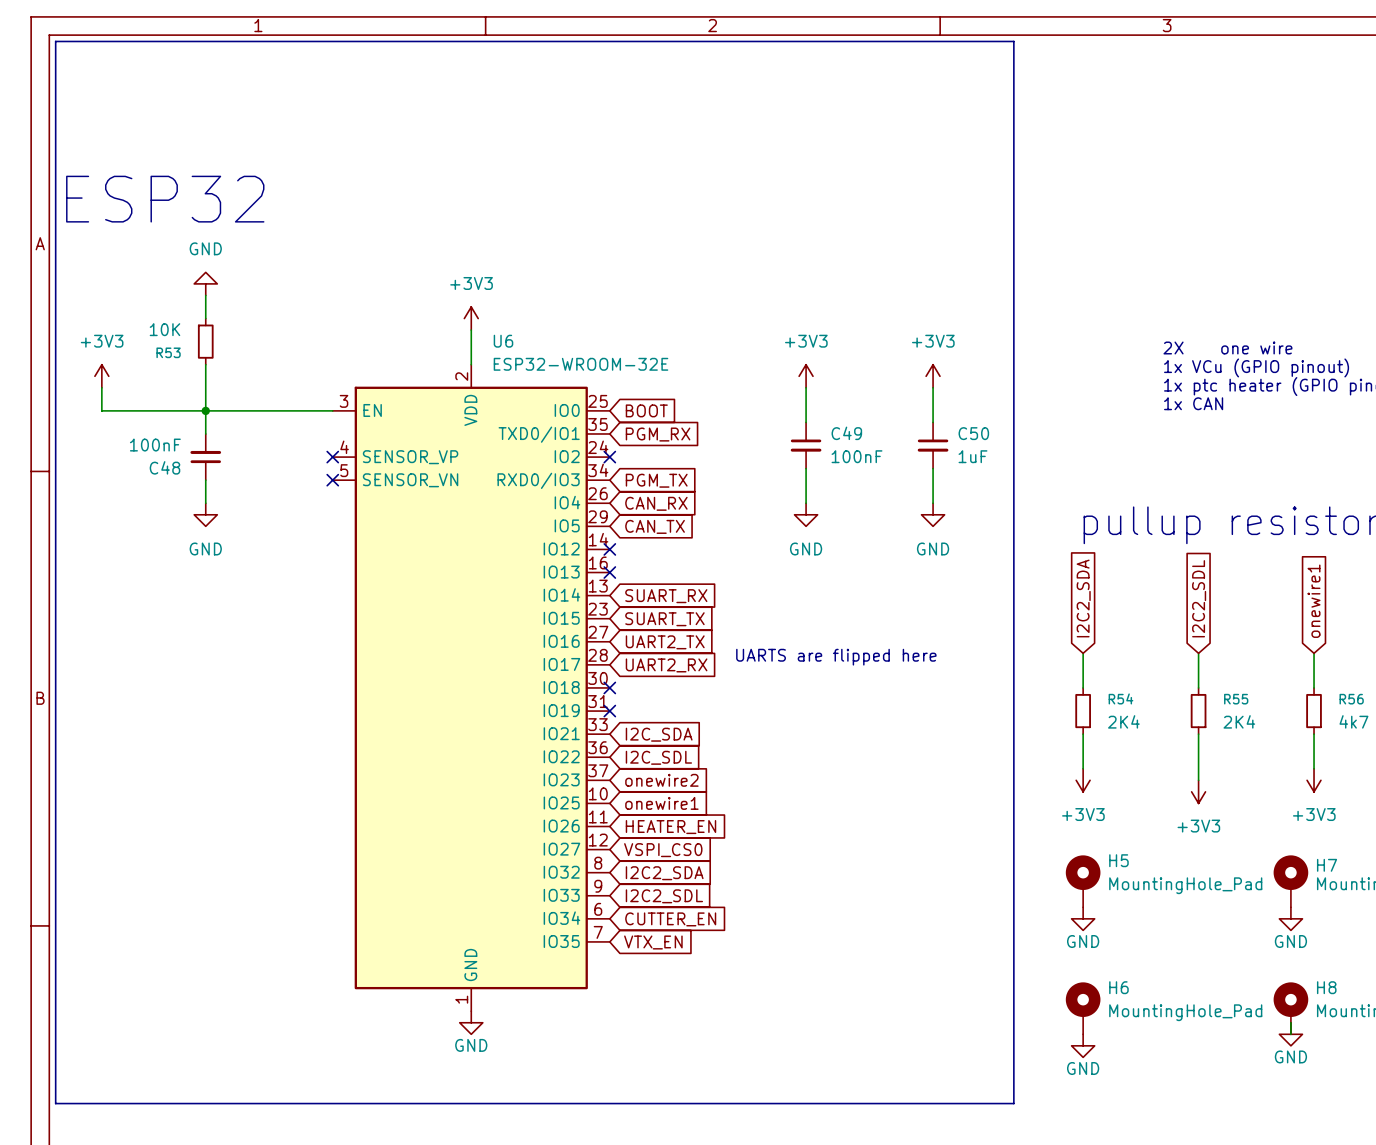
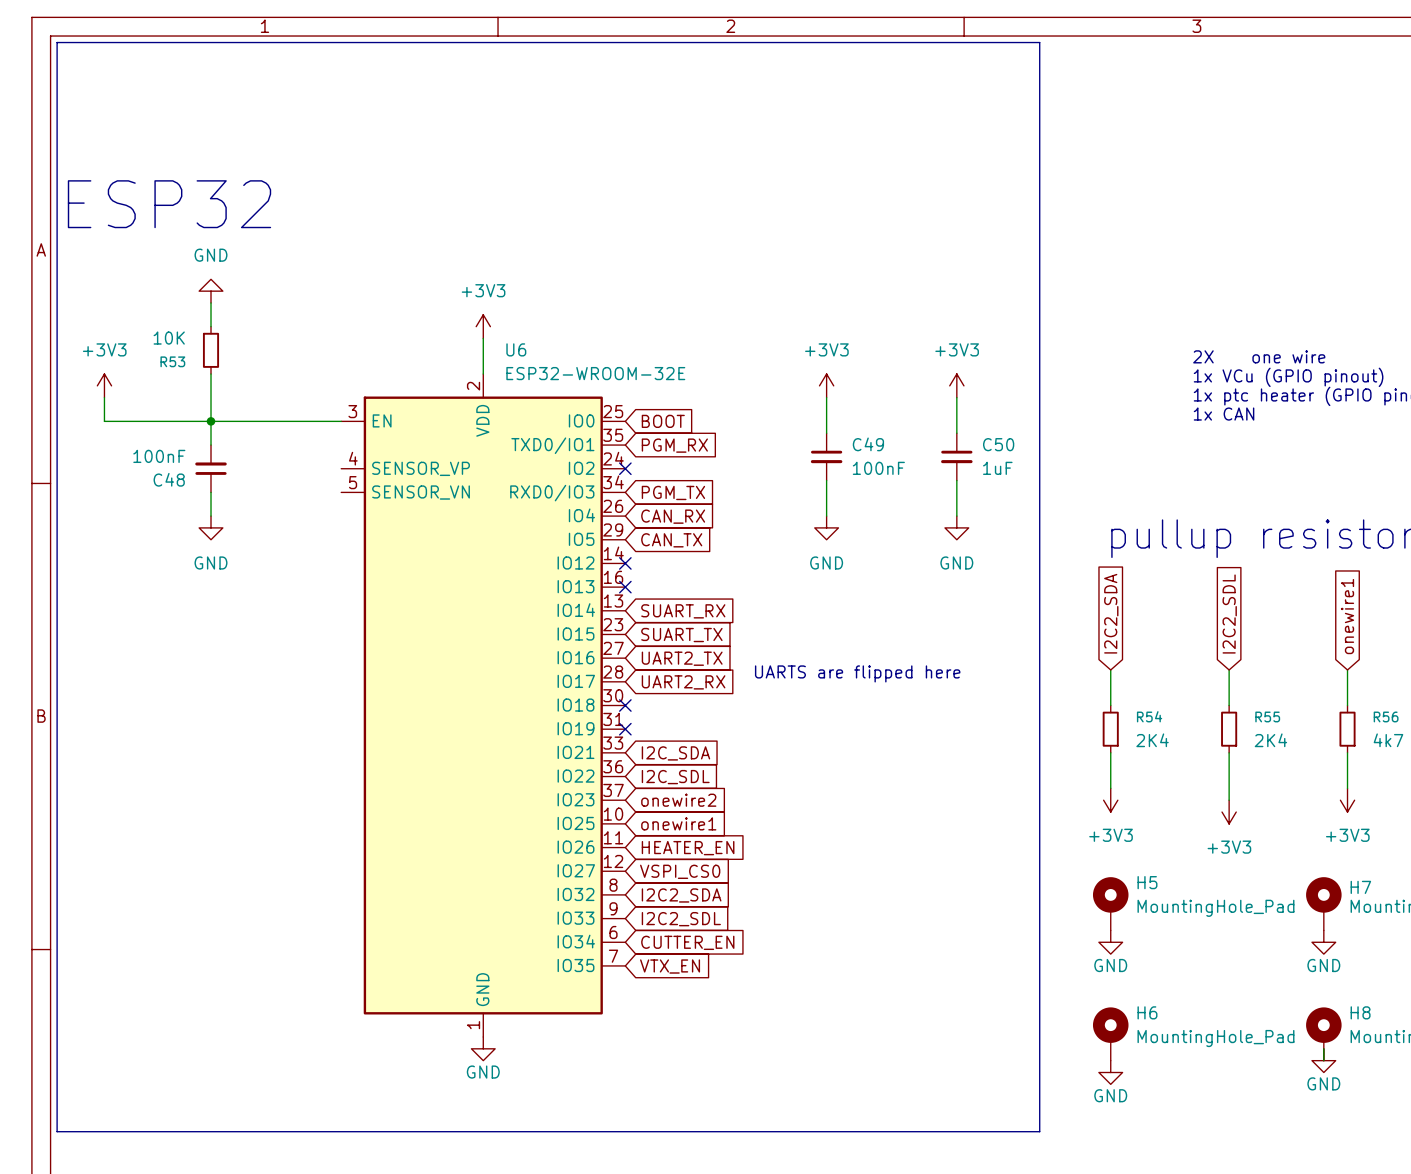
no-connect mark: (332, 457) -> none
no-connect mark: (332, 480) -> none

